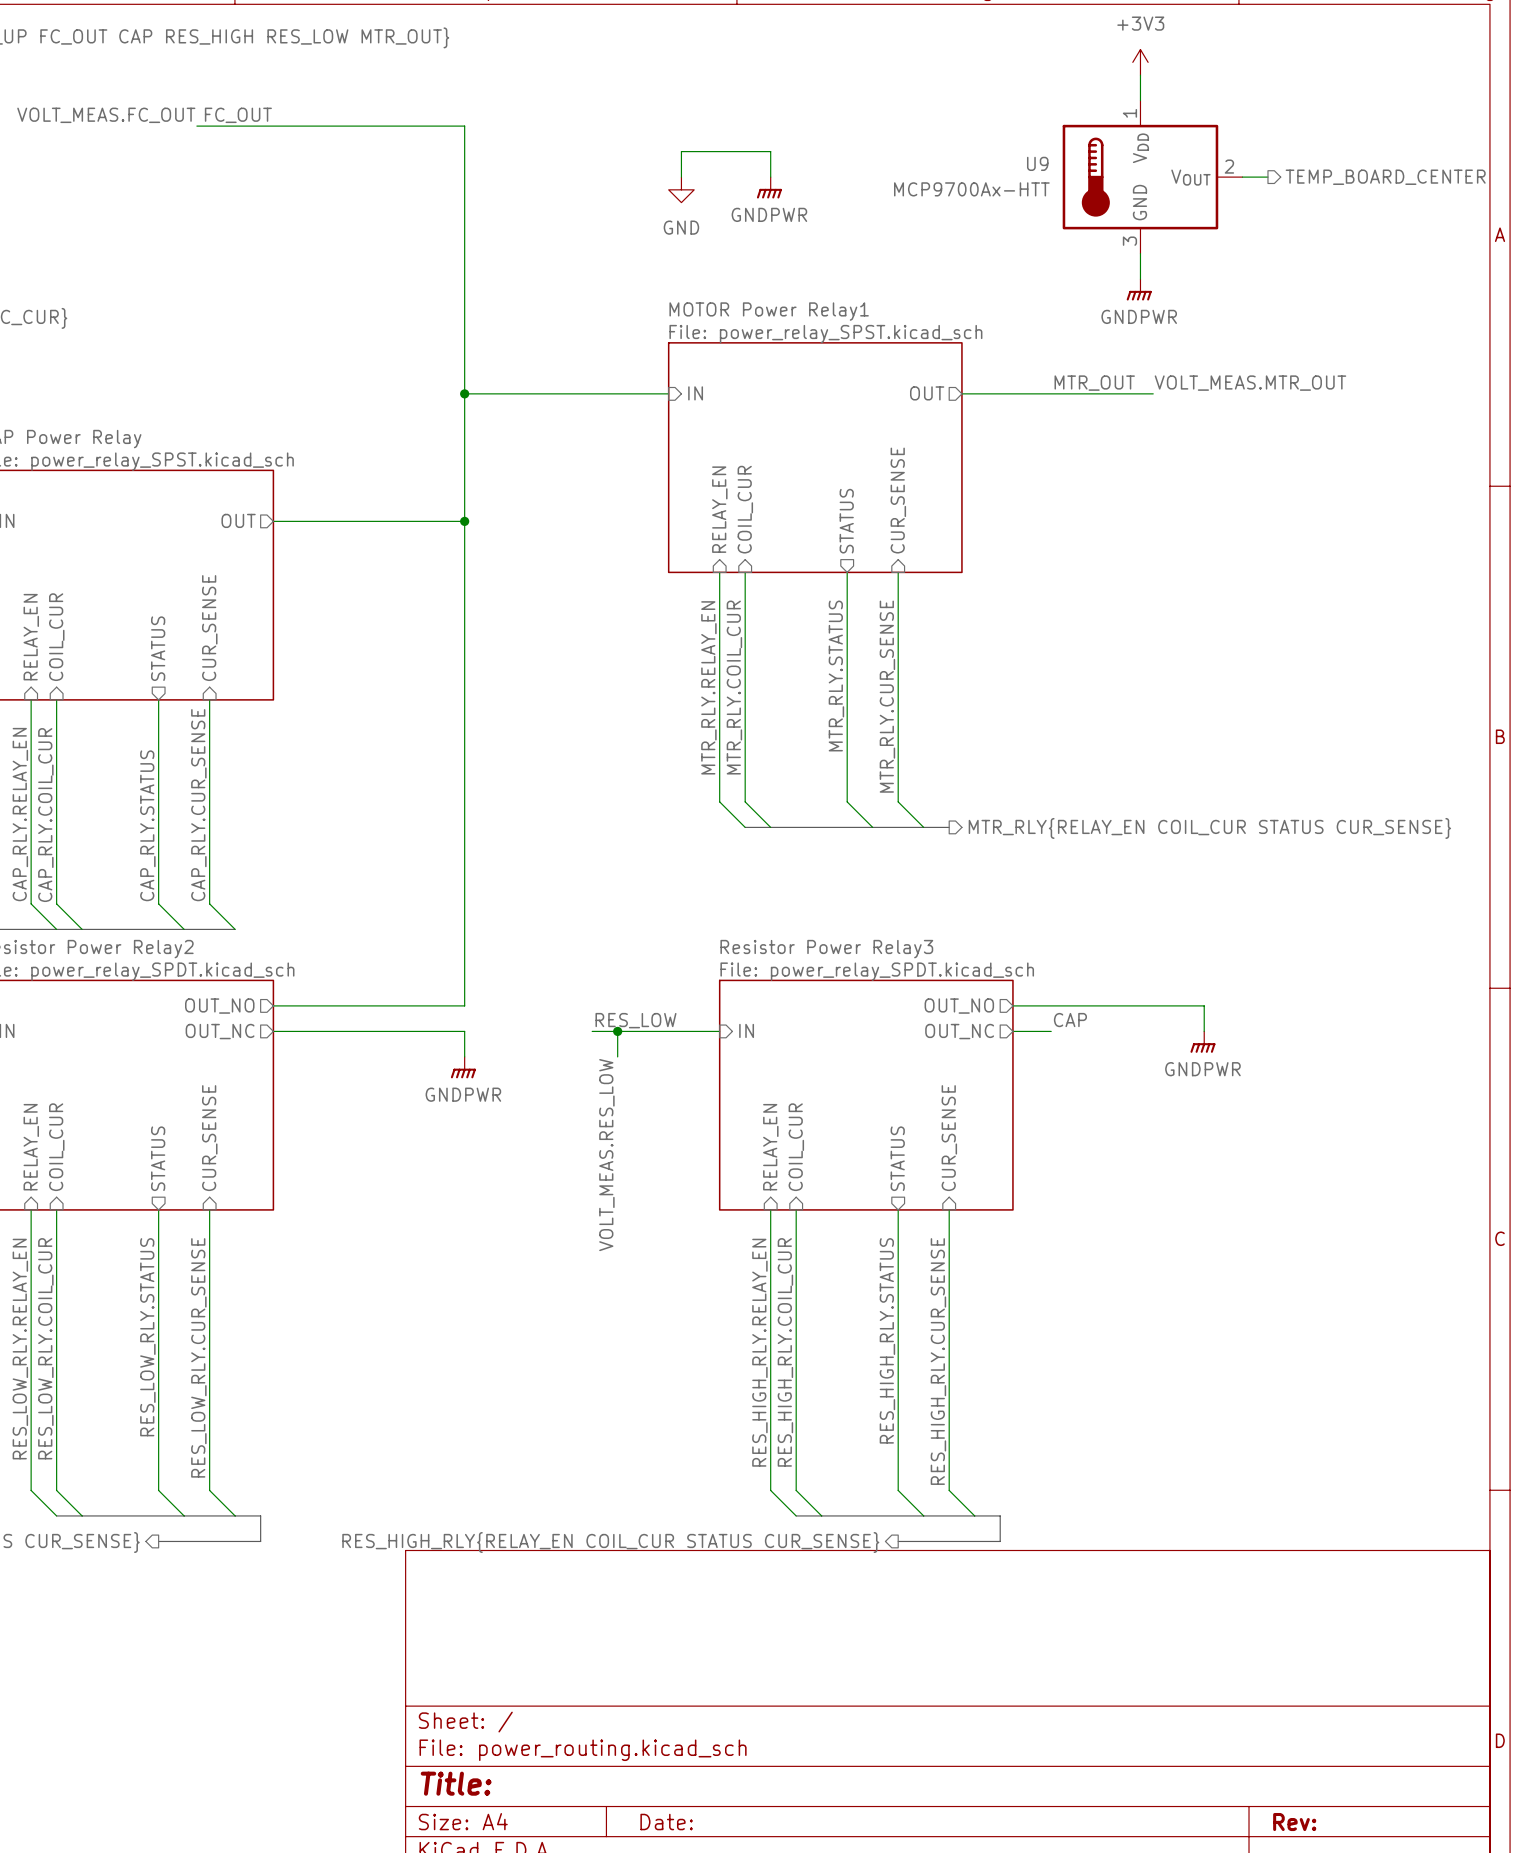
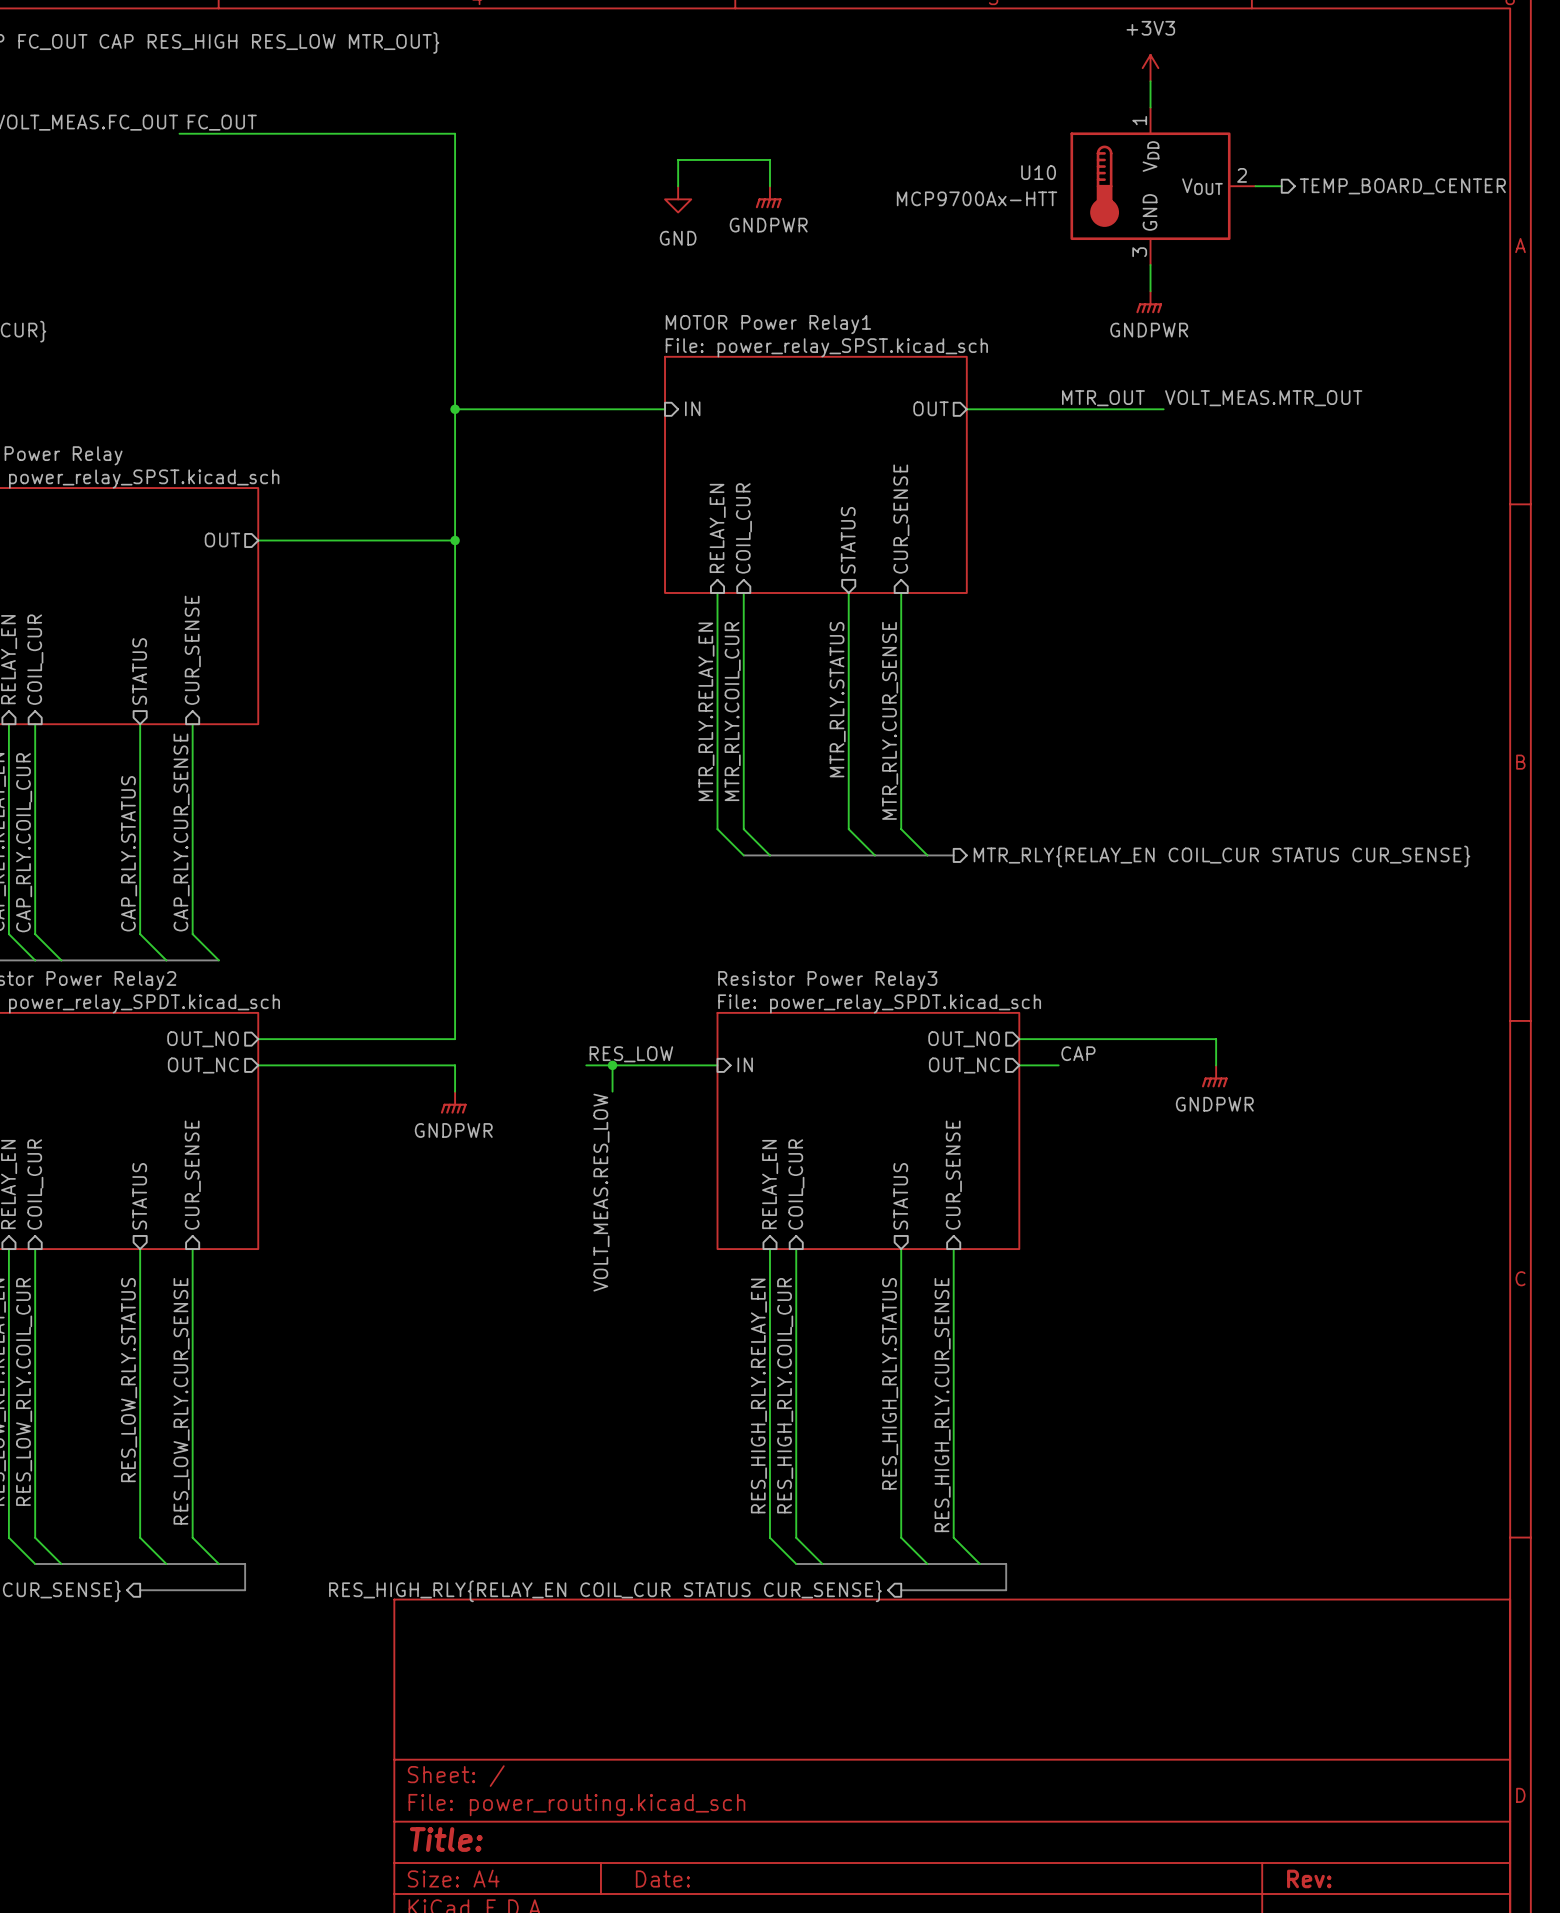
U9 name: U9 (1037, 163) -> U10 (1038, 172)

